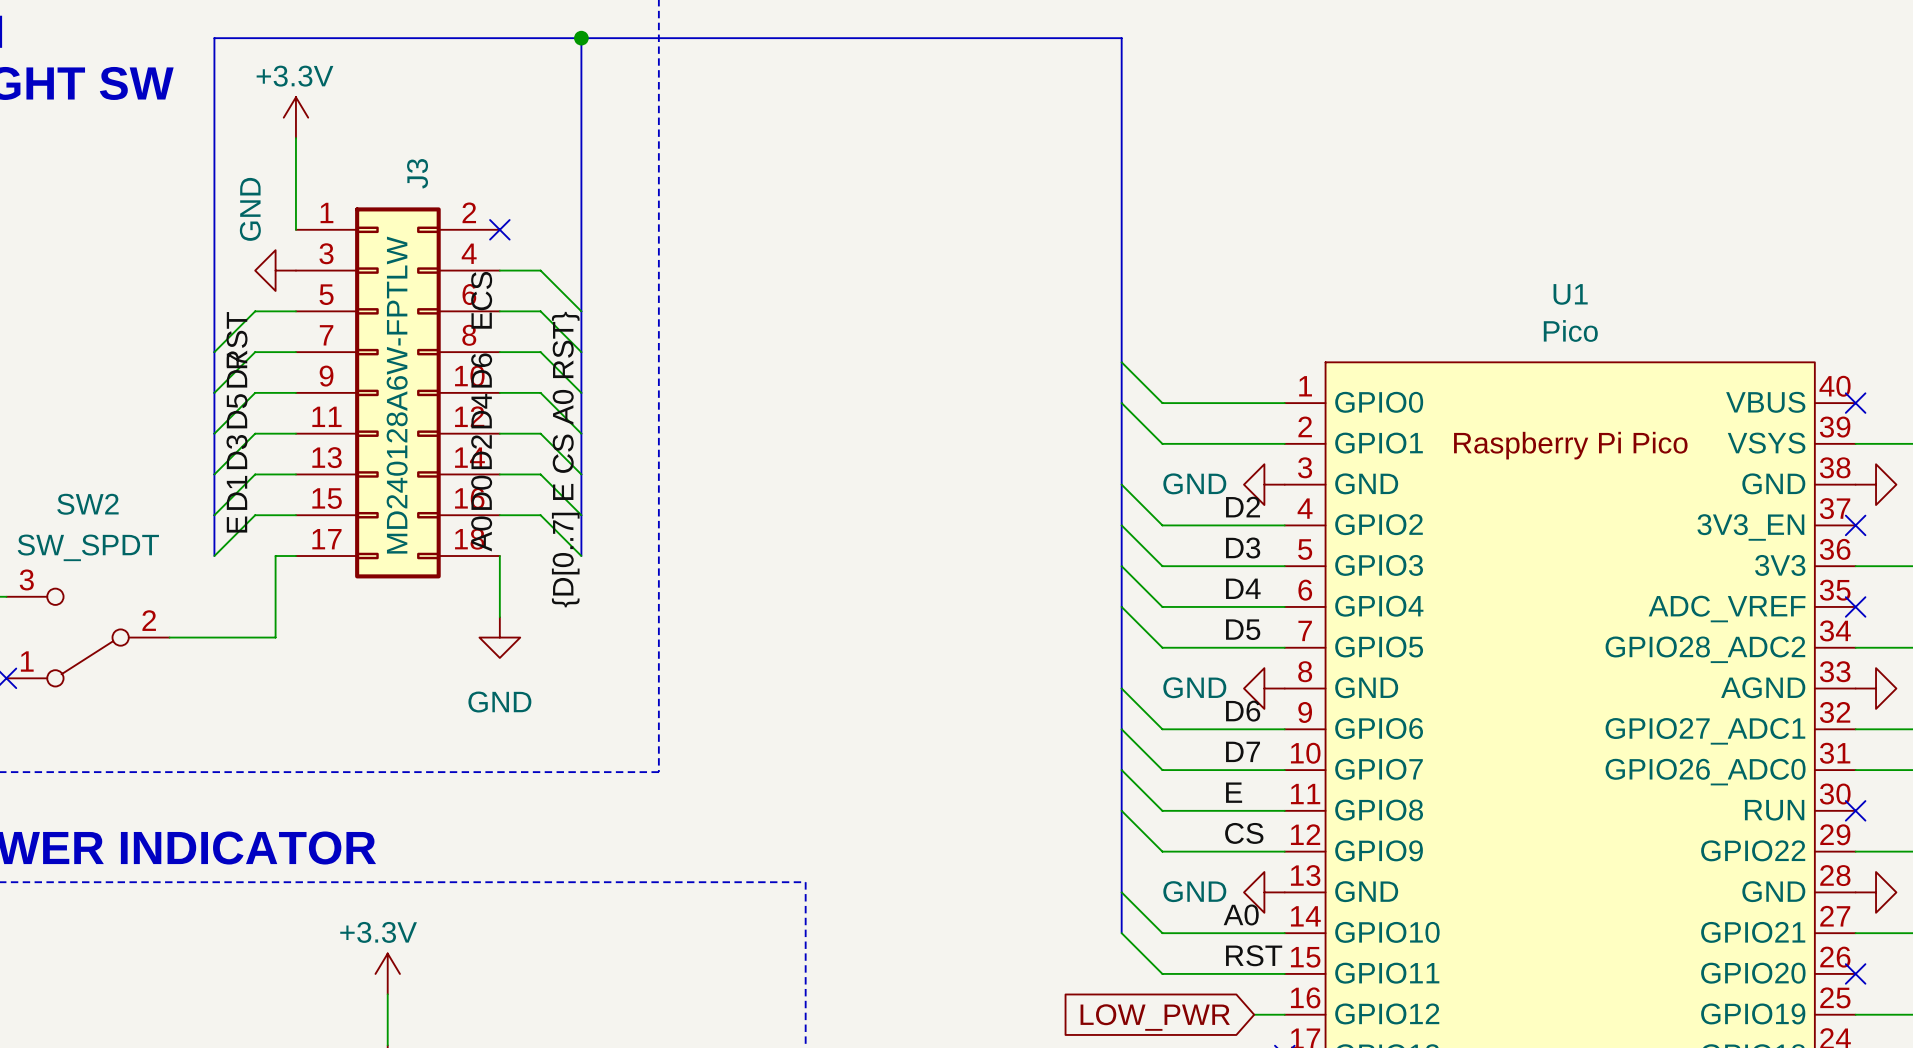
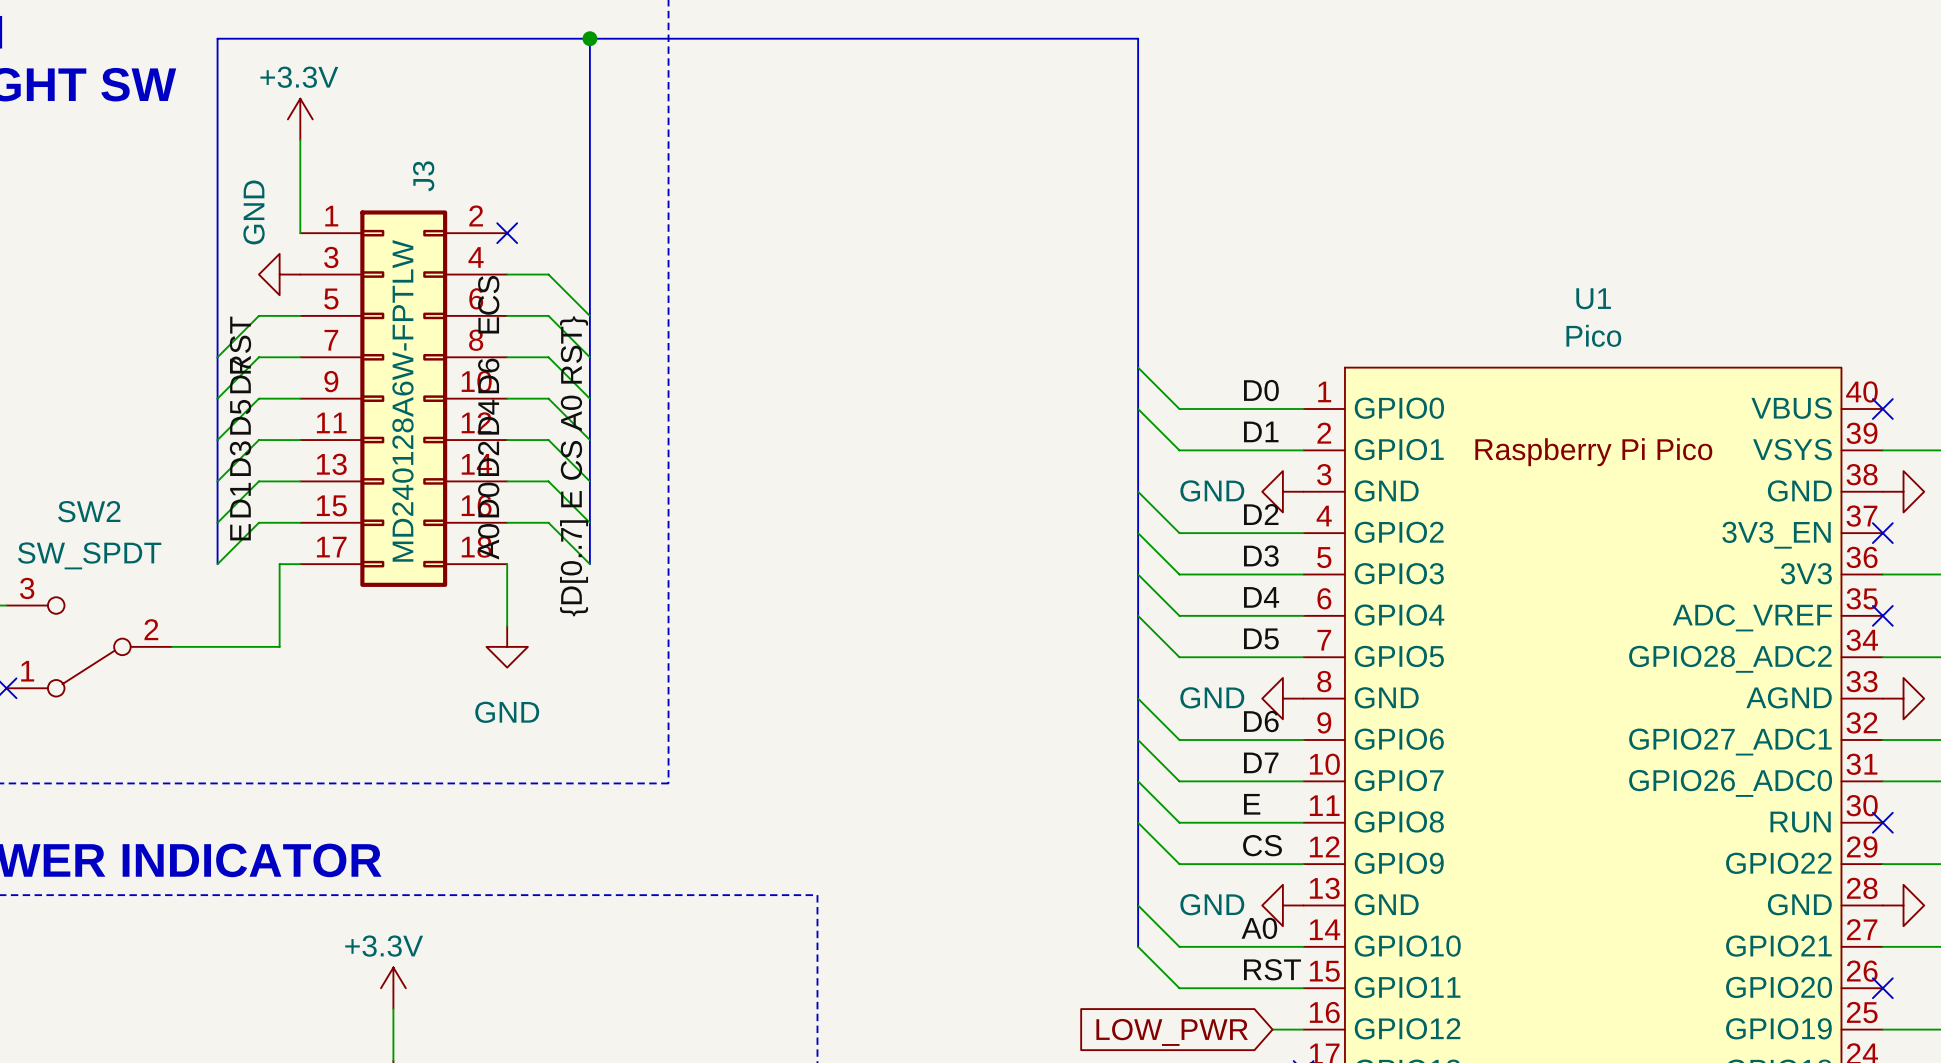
label: none -> D0 (1261, 390)
label: none -> D1 (1261, 431)

